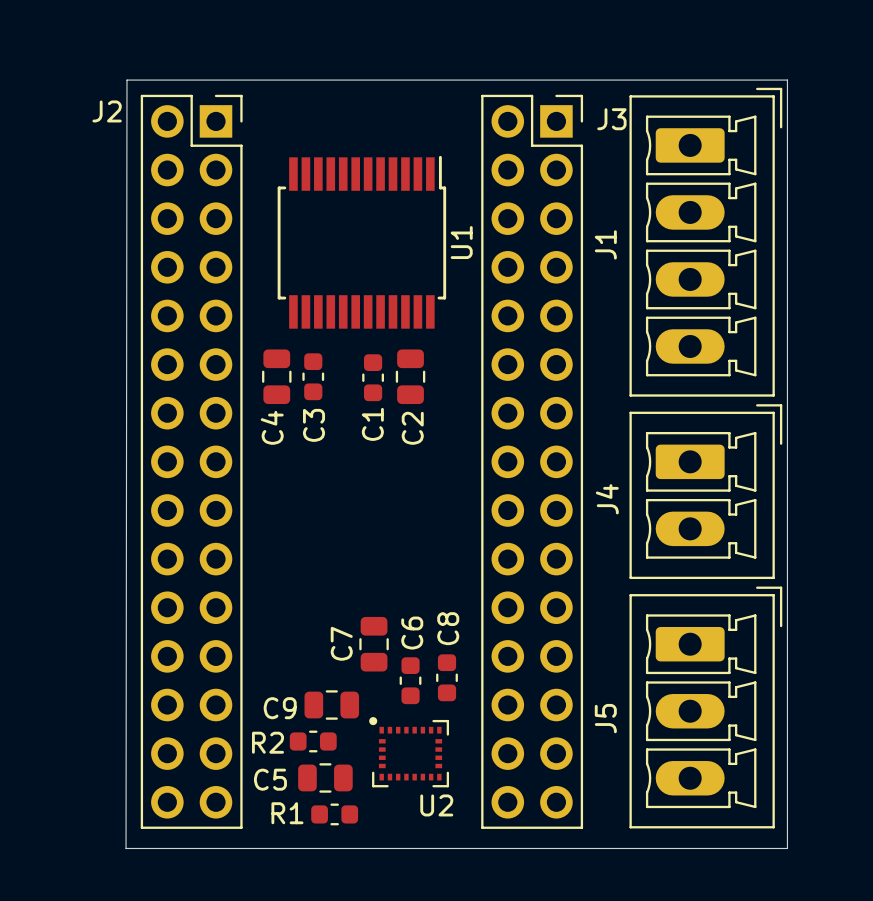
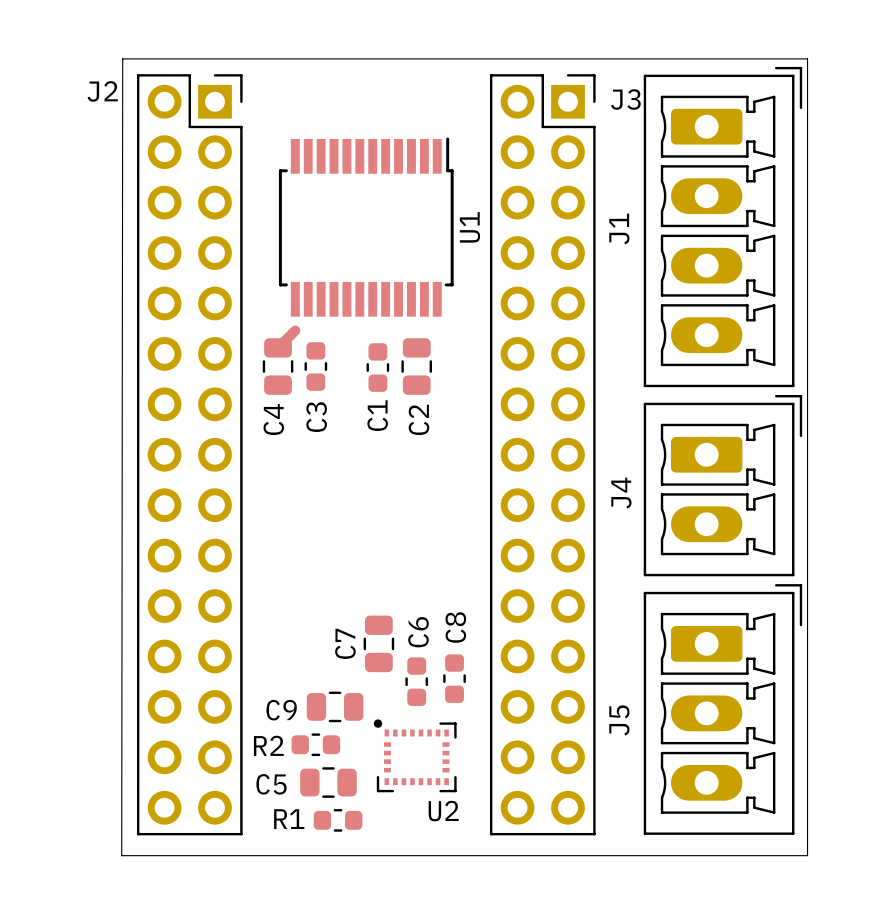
top track: none -> (295, 330) (278, 347)

